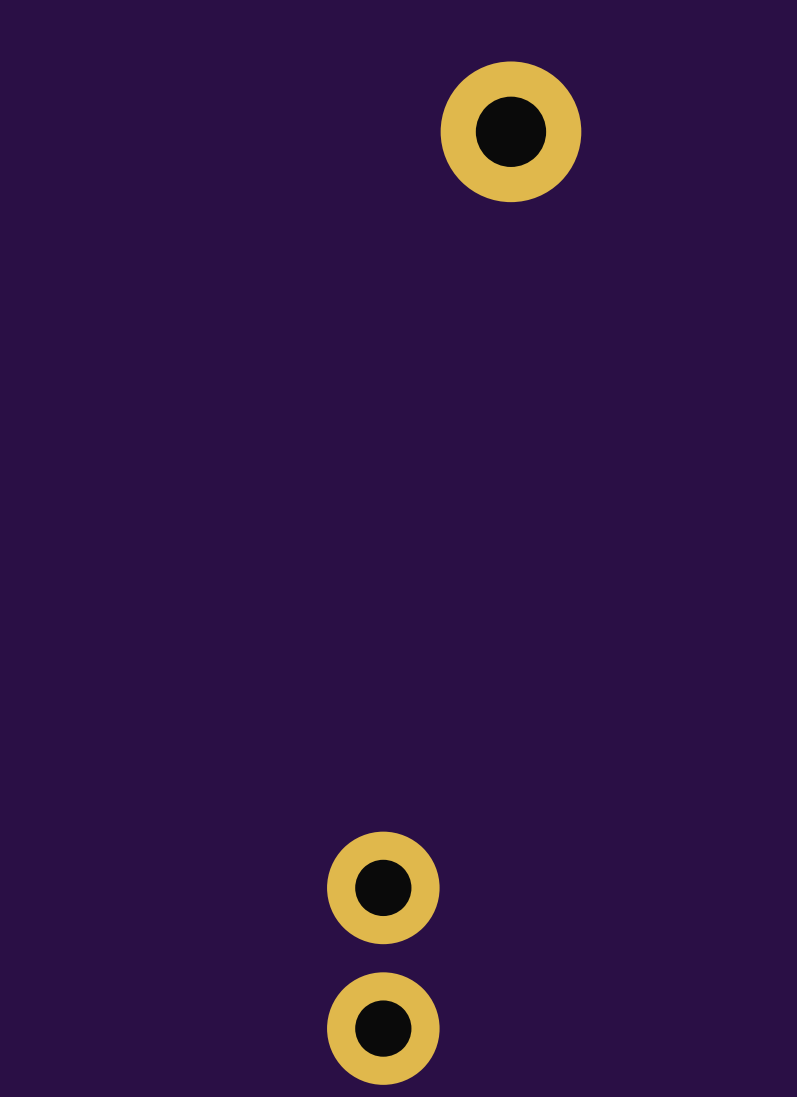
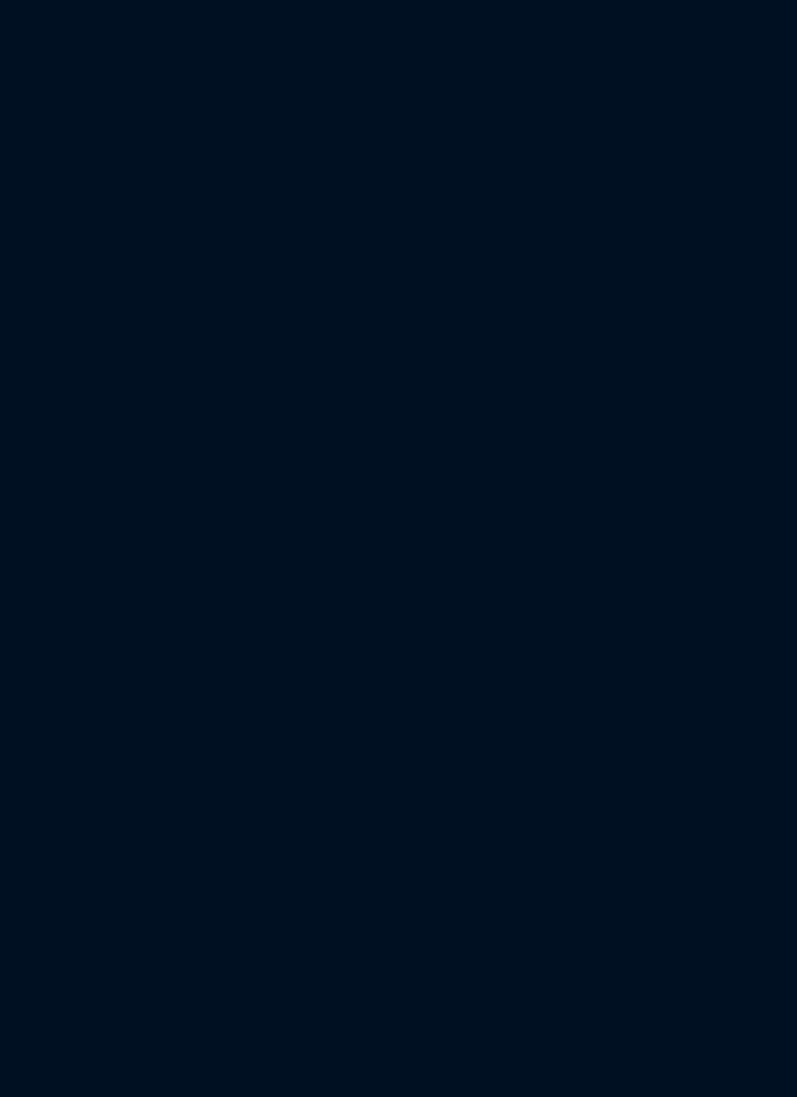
part: (510, 131) -> none
part: (383, 958) -> none

